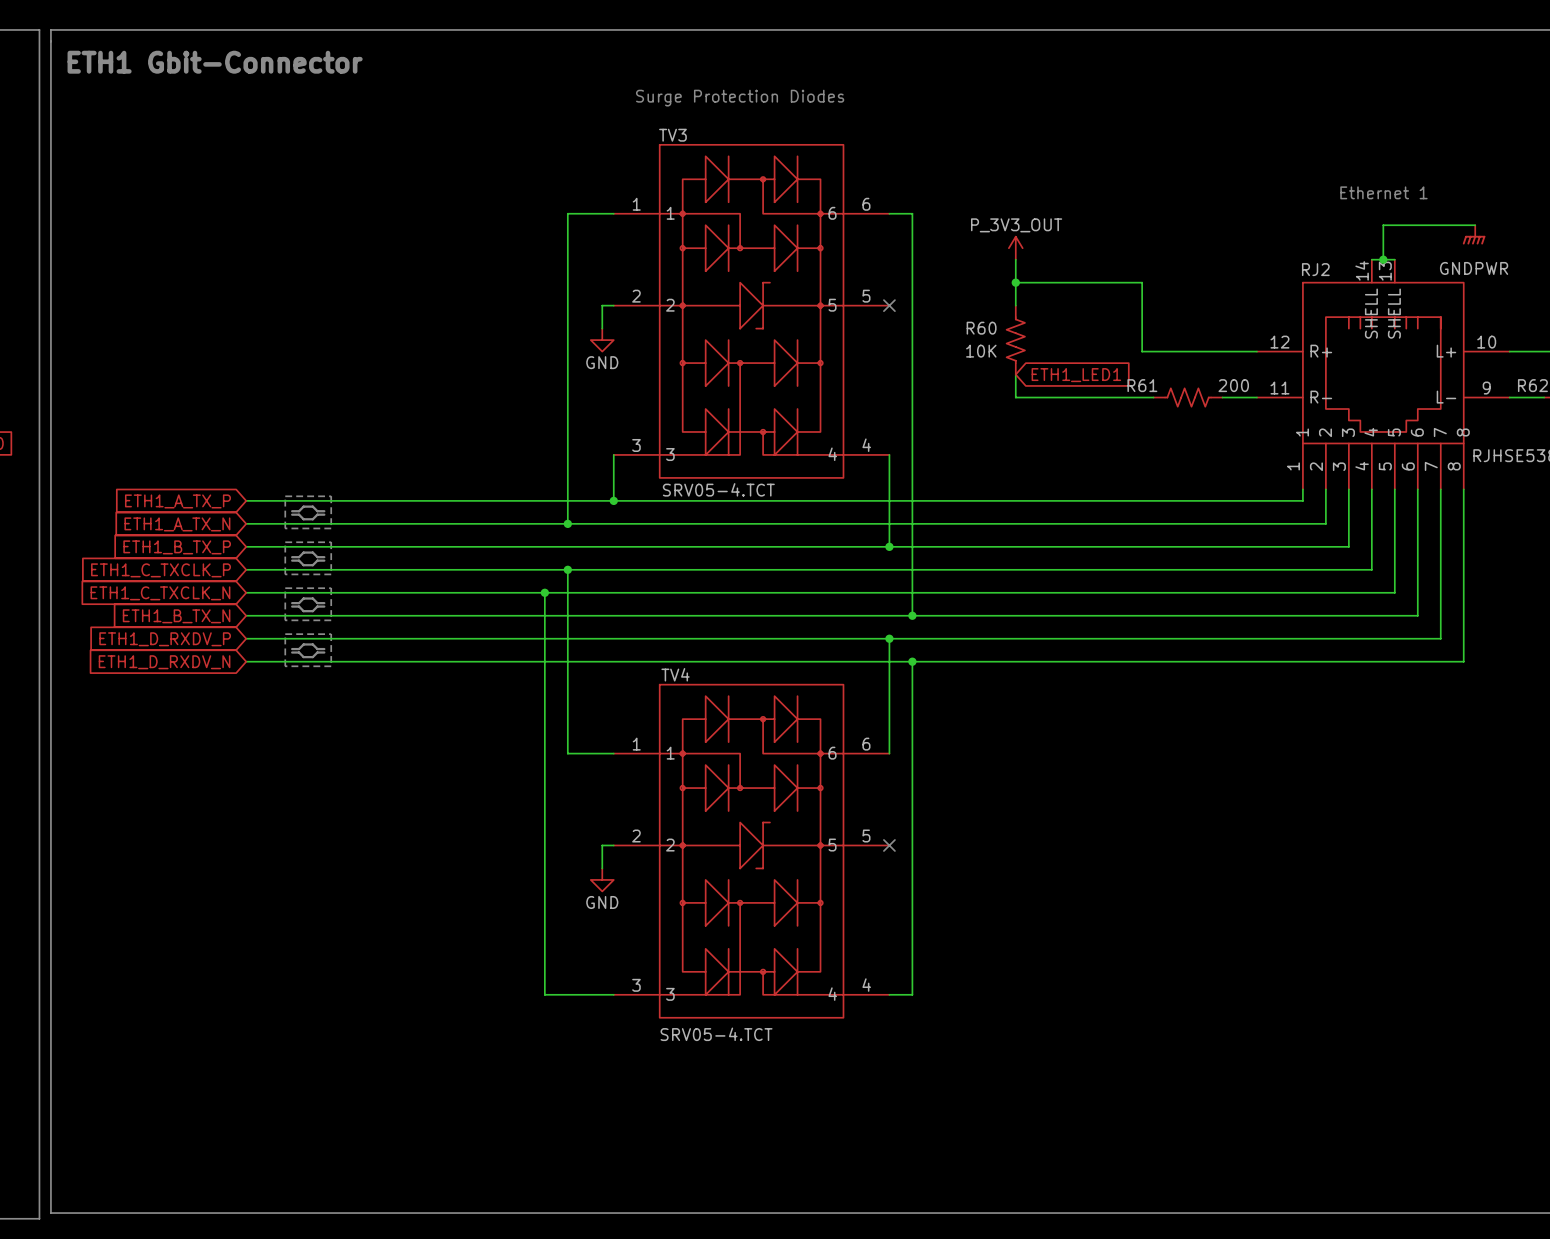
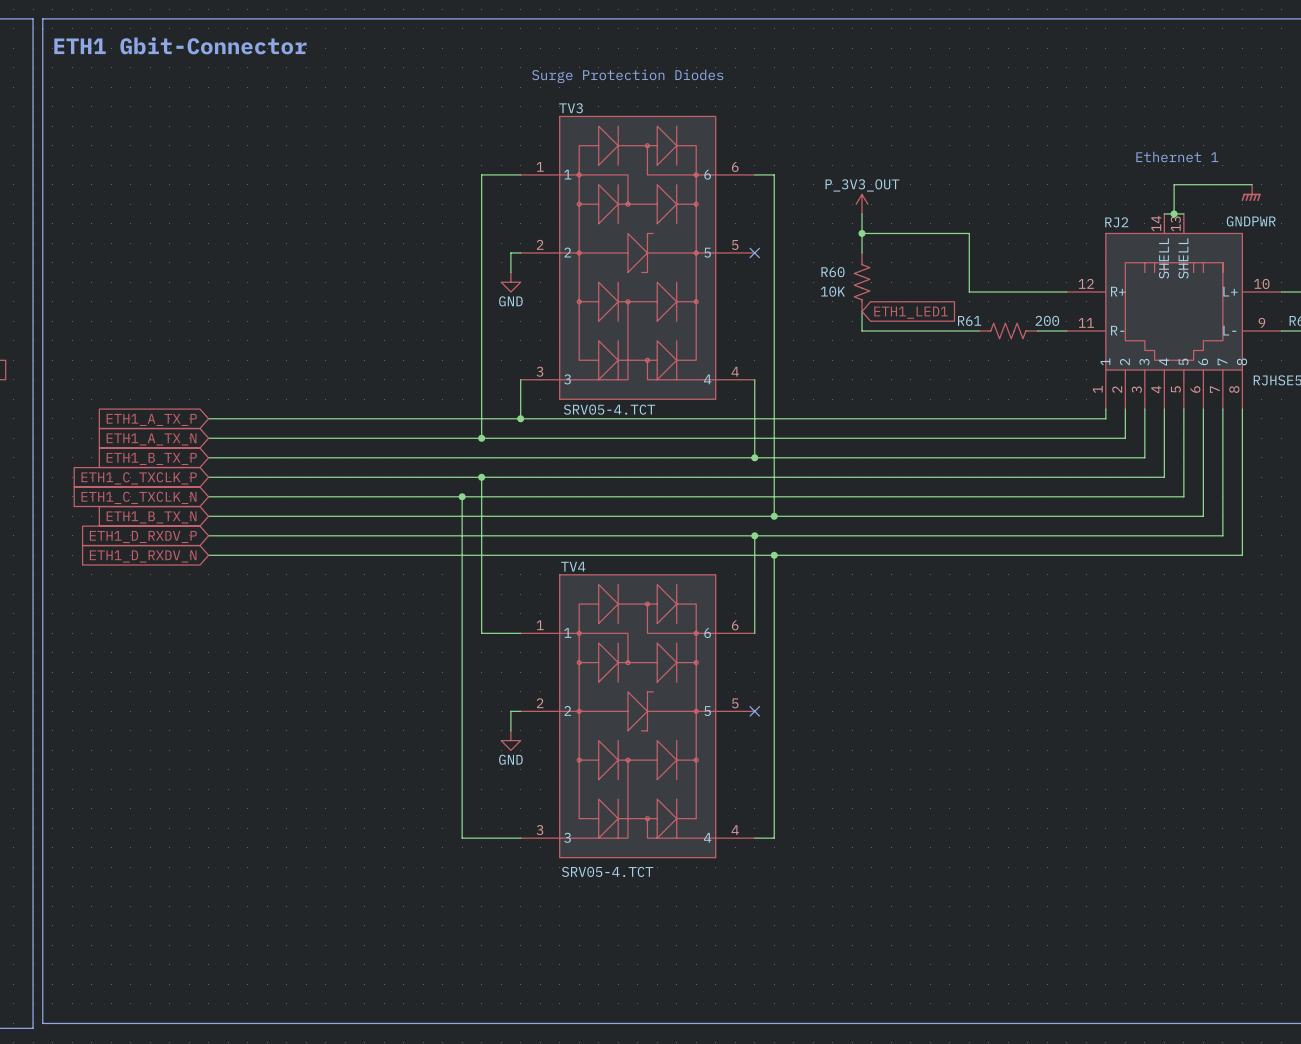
line: (285, 496) (285, 528) (331, 528) (331, 496) (285, 496) -> none
line: (292, 511) (299, 511) (303, 506) (312, 506) (317, 511) (324, 511) -> none
line: (292, 514) (299, 514) (303, 519) (312, 519) (317, 514) (324, 514) -> none
line: (285, 542) (285, 574) (331, 574) (331, 542) (285, 542) -> none
line: (292, 557) (299, 557) (303, 552) (312, 552) (317, 557) (324, 557) -> none
line: (292, 560) (299, 560) (303, 565) (312, 565) (317, 560) (324, 560) -> none
line: (285, 588) (331, 588) (331, 620) (285, 620) (285, 588) -> none
line: (292, 603) (299, 603) (303, 598) (312, 598) (317, 603) (324, 603) -> none
line: (292, 606) (299, 606) (303, 611) (312, 611) (317, 606) (324, 606) -> none
line: (285, 634) (285, 666) (331, 666) (331, 634) (285, 634) -> none
line: (292, 649) (299, 649) (303, 644) (312, 644) (317, 649) (324, 649) -> none
line: (292, 652) (299, 652) (303, 657) (312, 657) (317, 652) (324, 652) -> none

